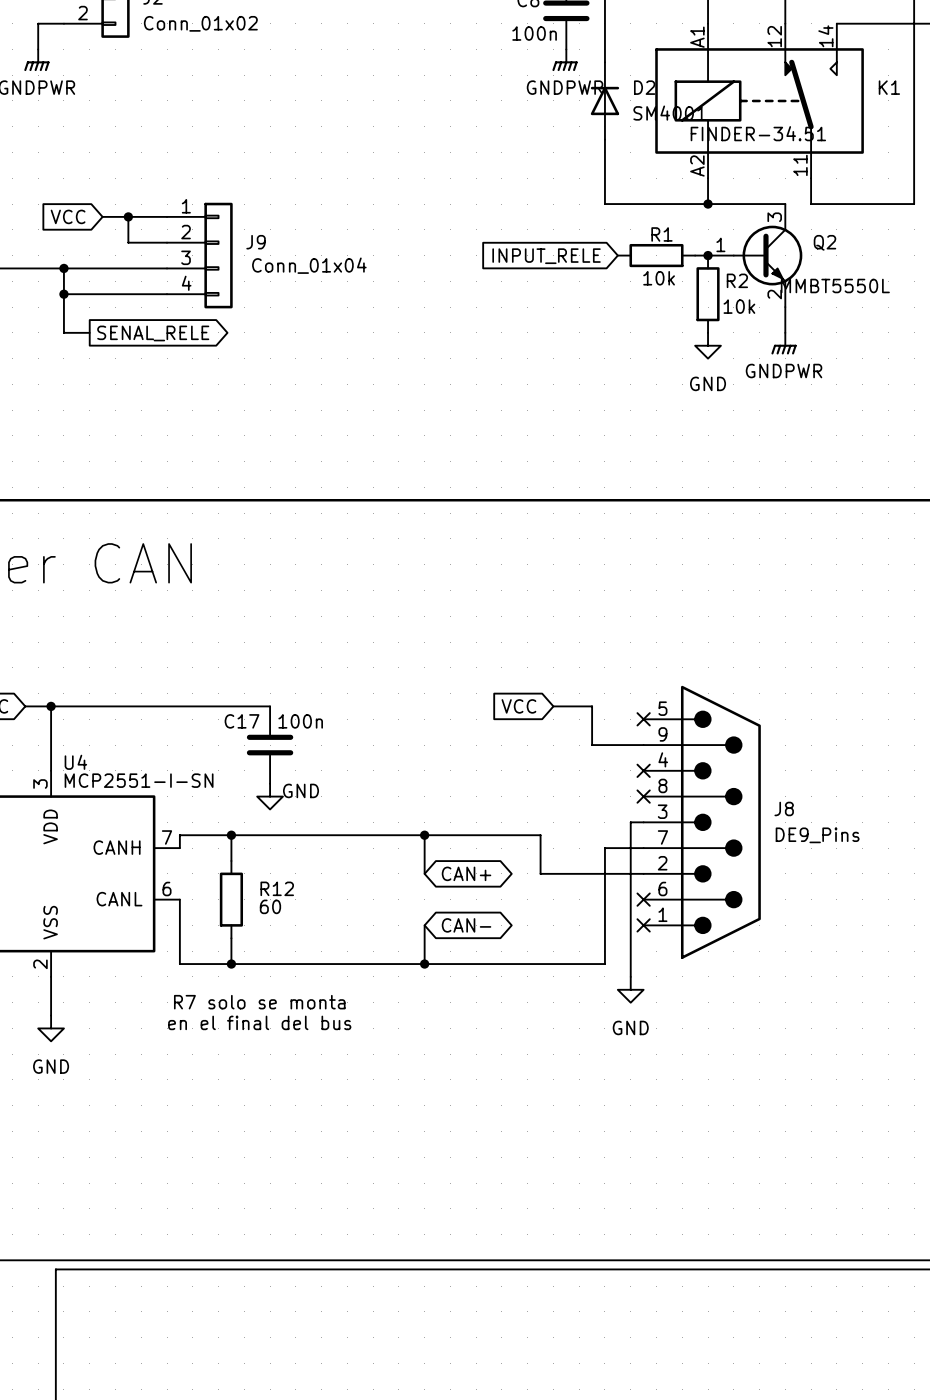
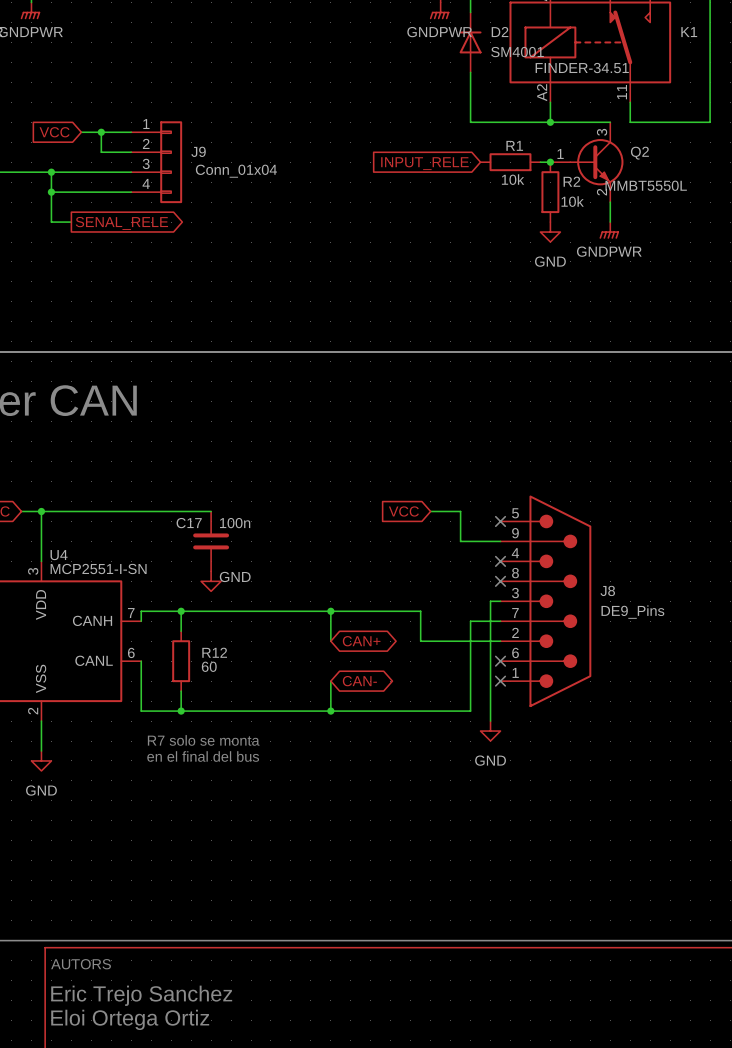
text: none -> AUTORS (81, 964)
text: none -> Eric Trejo Sanchez (141, 995)
text: none -> Eloi Ortega Ortiz (130, 1019)

